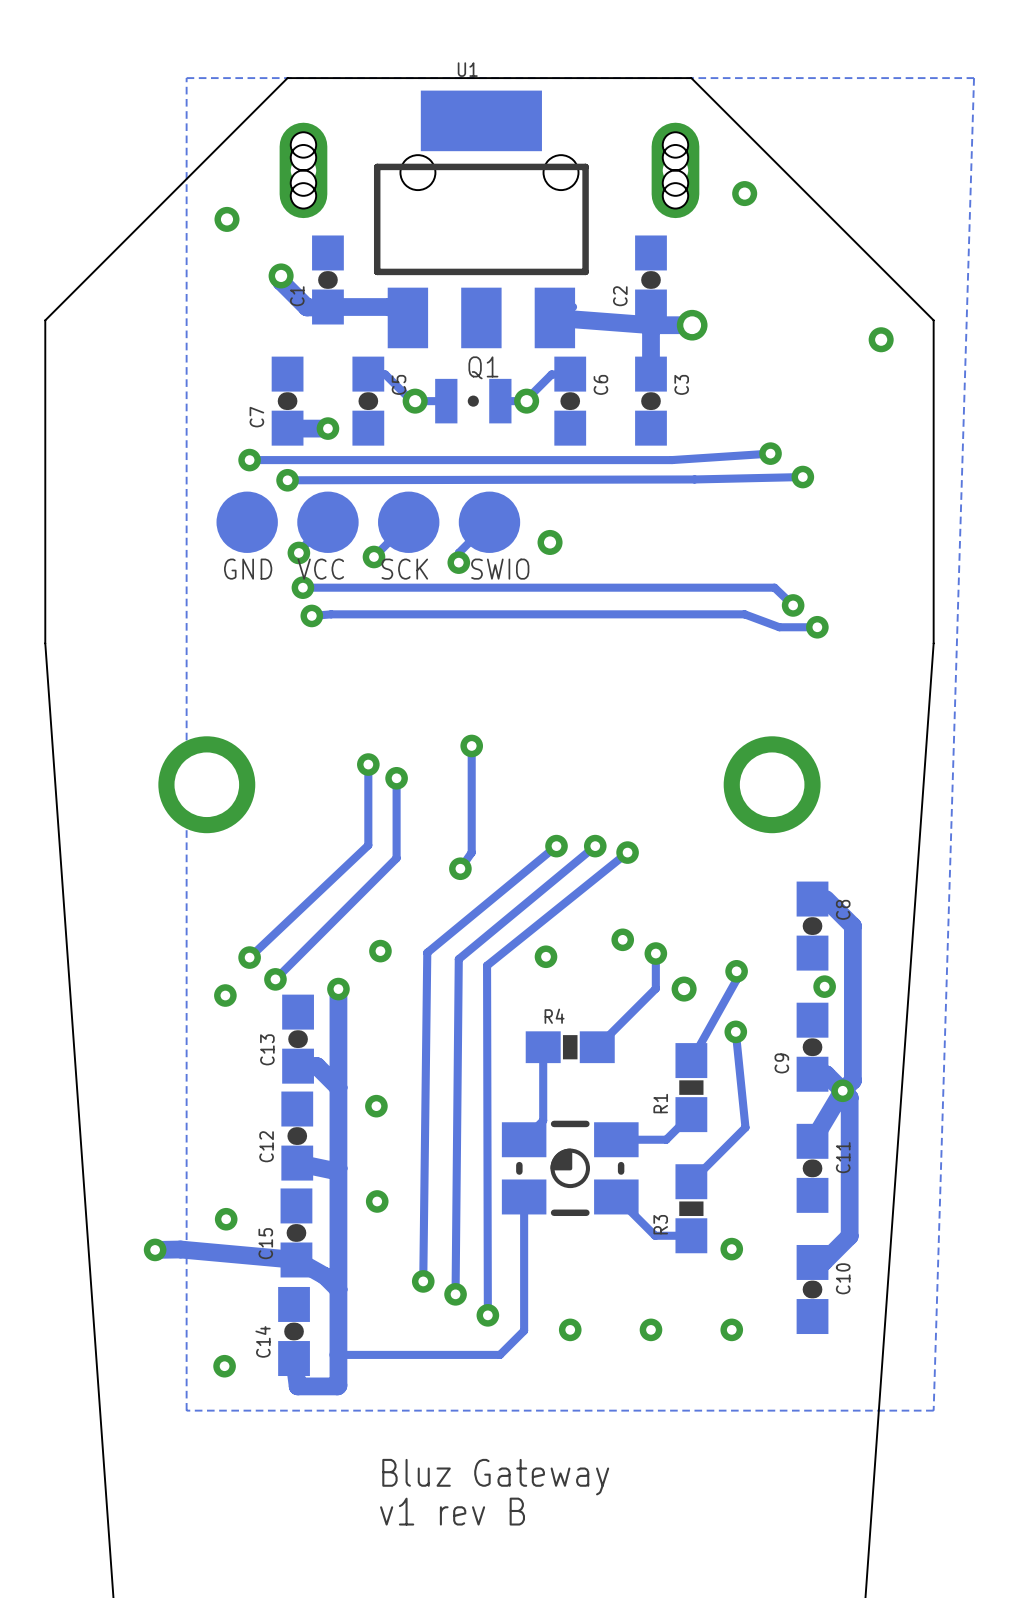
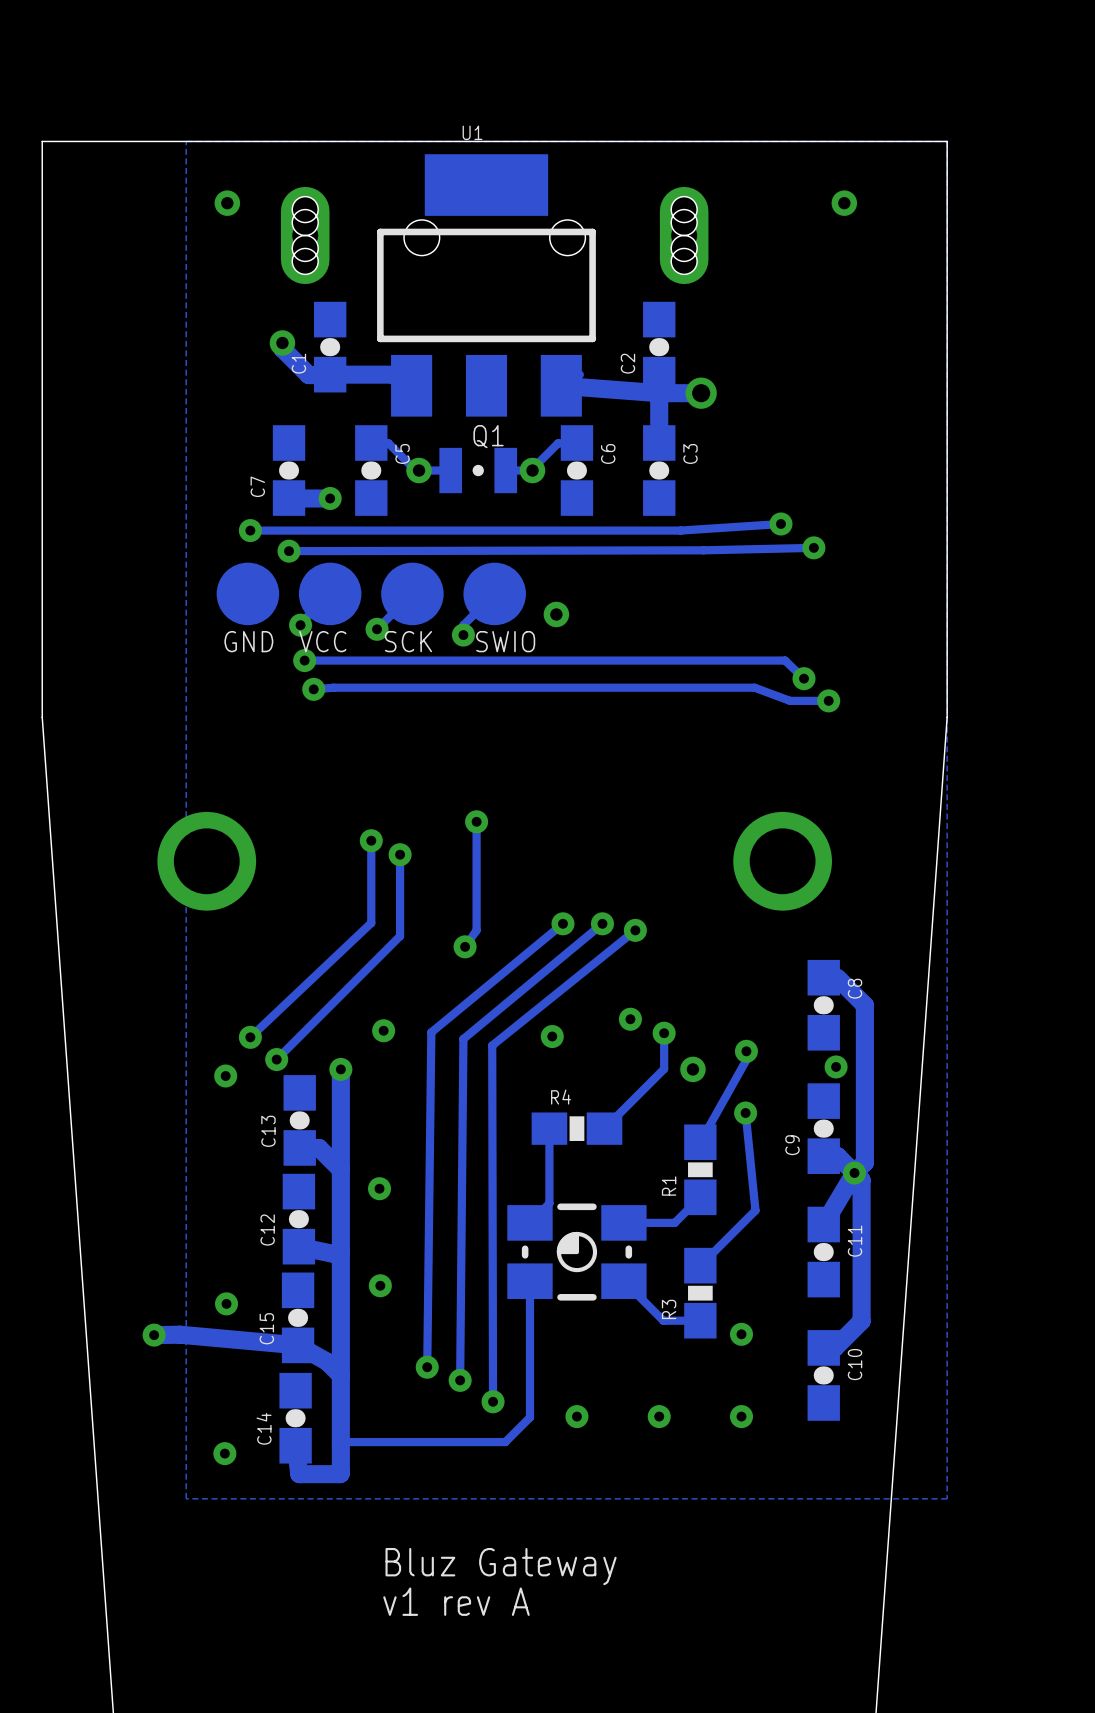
board edge: (287, 78) (45, 320) -> (289, 141) (42, 141) (42, 388)
board edge: (691, 78) (933, 320) -> (700, 141) (947, 141) (947, 388)
zone outline: (933, 78) (974, 78) (933, 1410) -> (947, 141) (947, 1498)
via: none -> (844, 203)
via: (744, 193) -> none
via position: (227, 219) -> (227, 203)
via: (881, 339) -> none
text: v1 rev B (452, 1511) -> v1 rev A (456, 1601)

